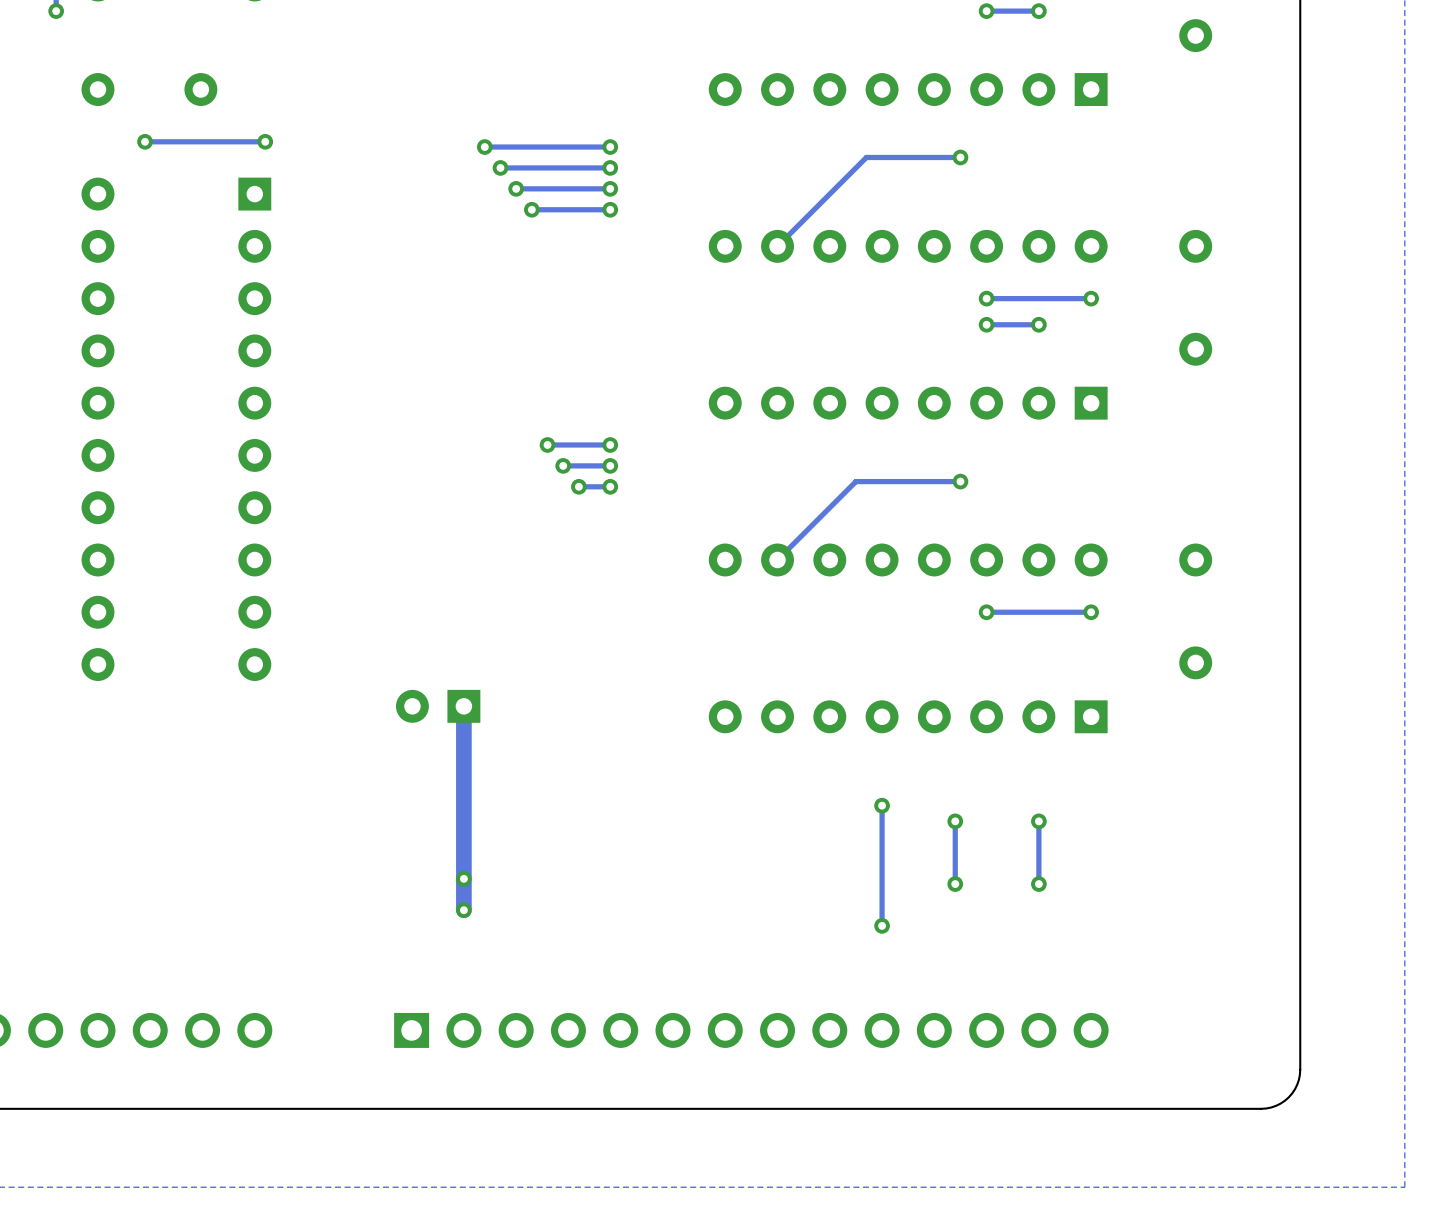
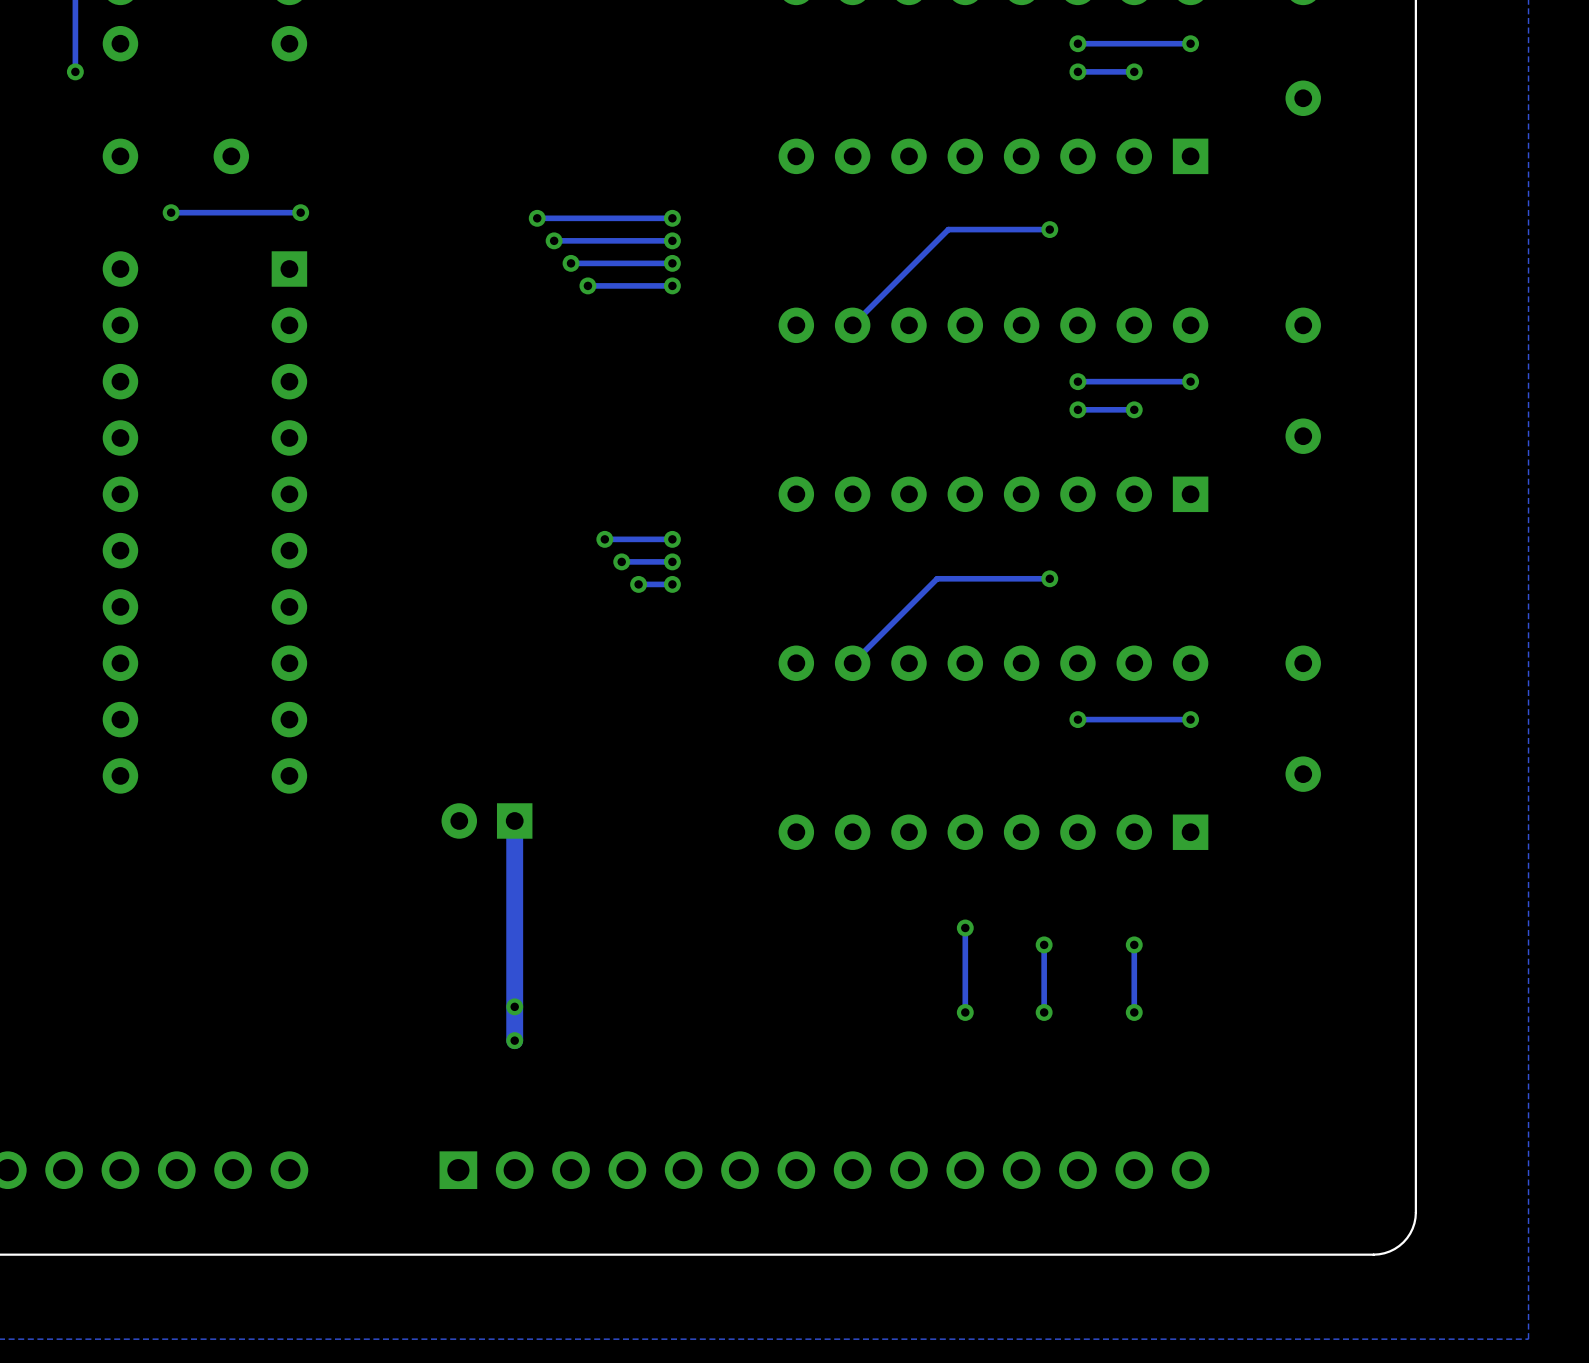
track: (882, 884) (882, 925) -> none
via position: (882, 925) -> (965, 1012)

